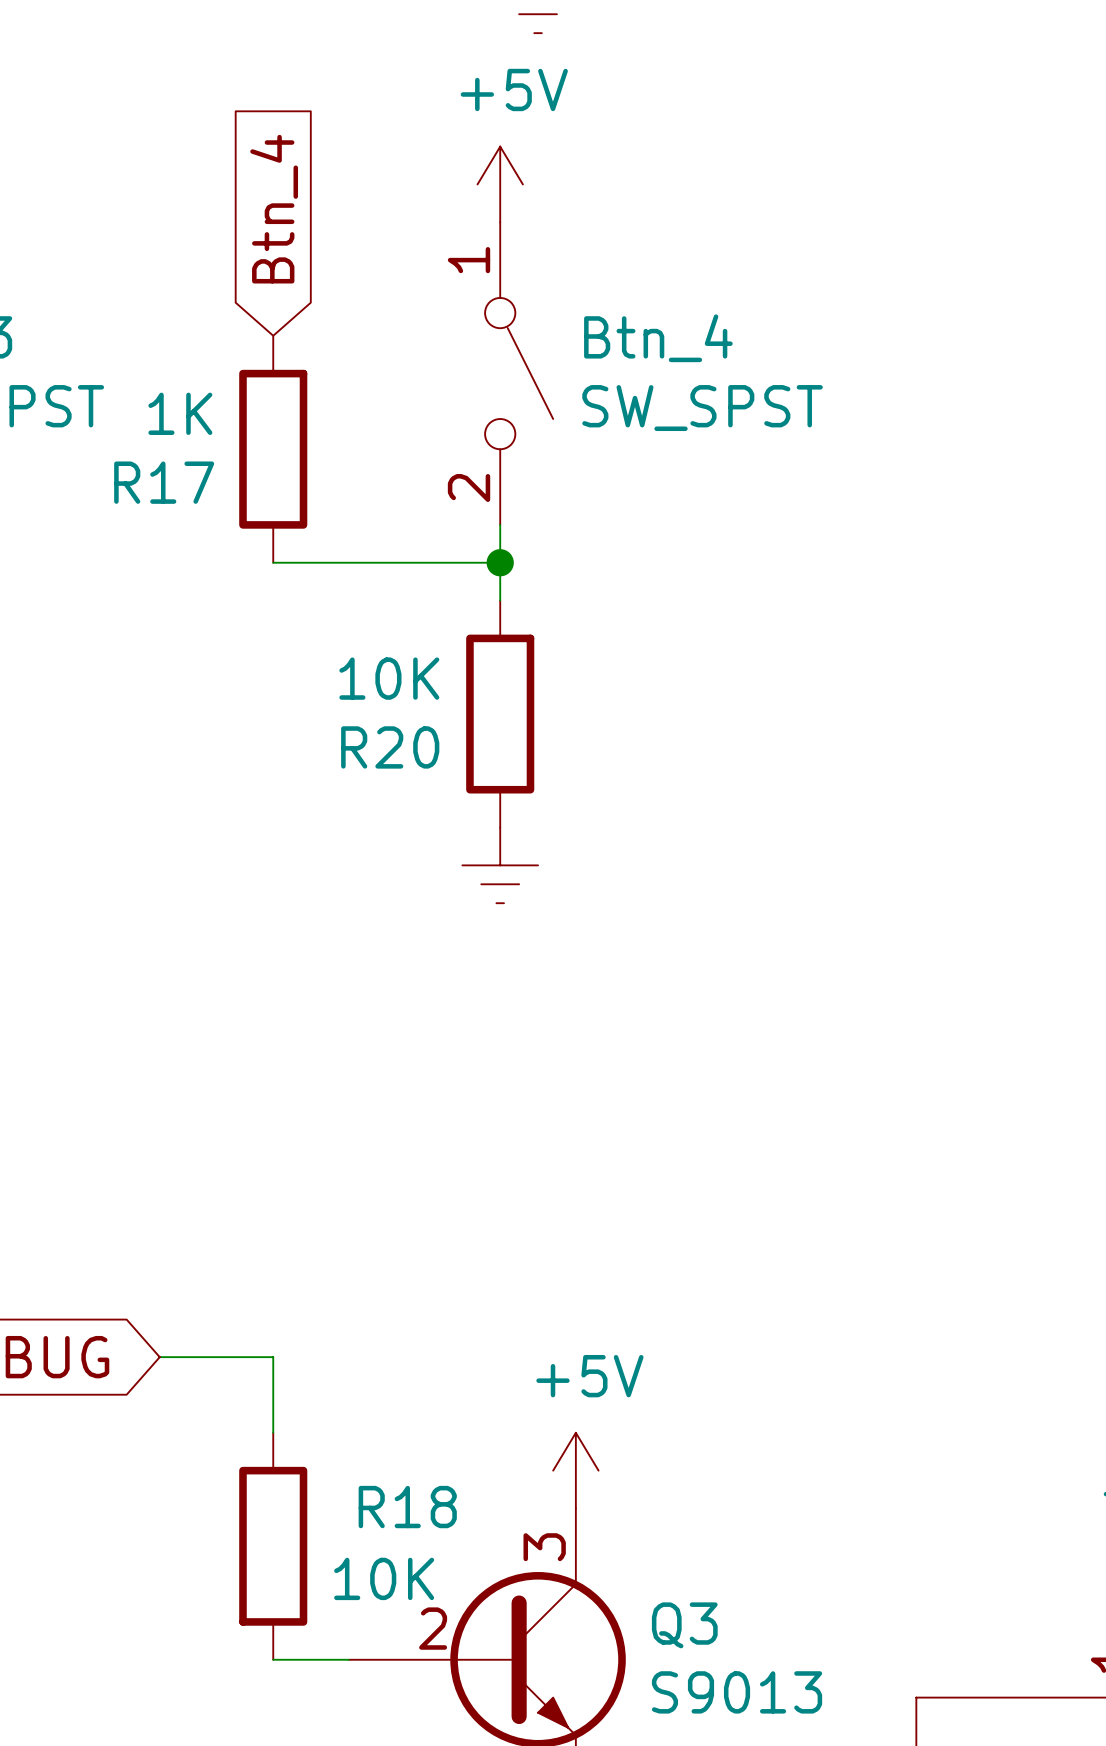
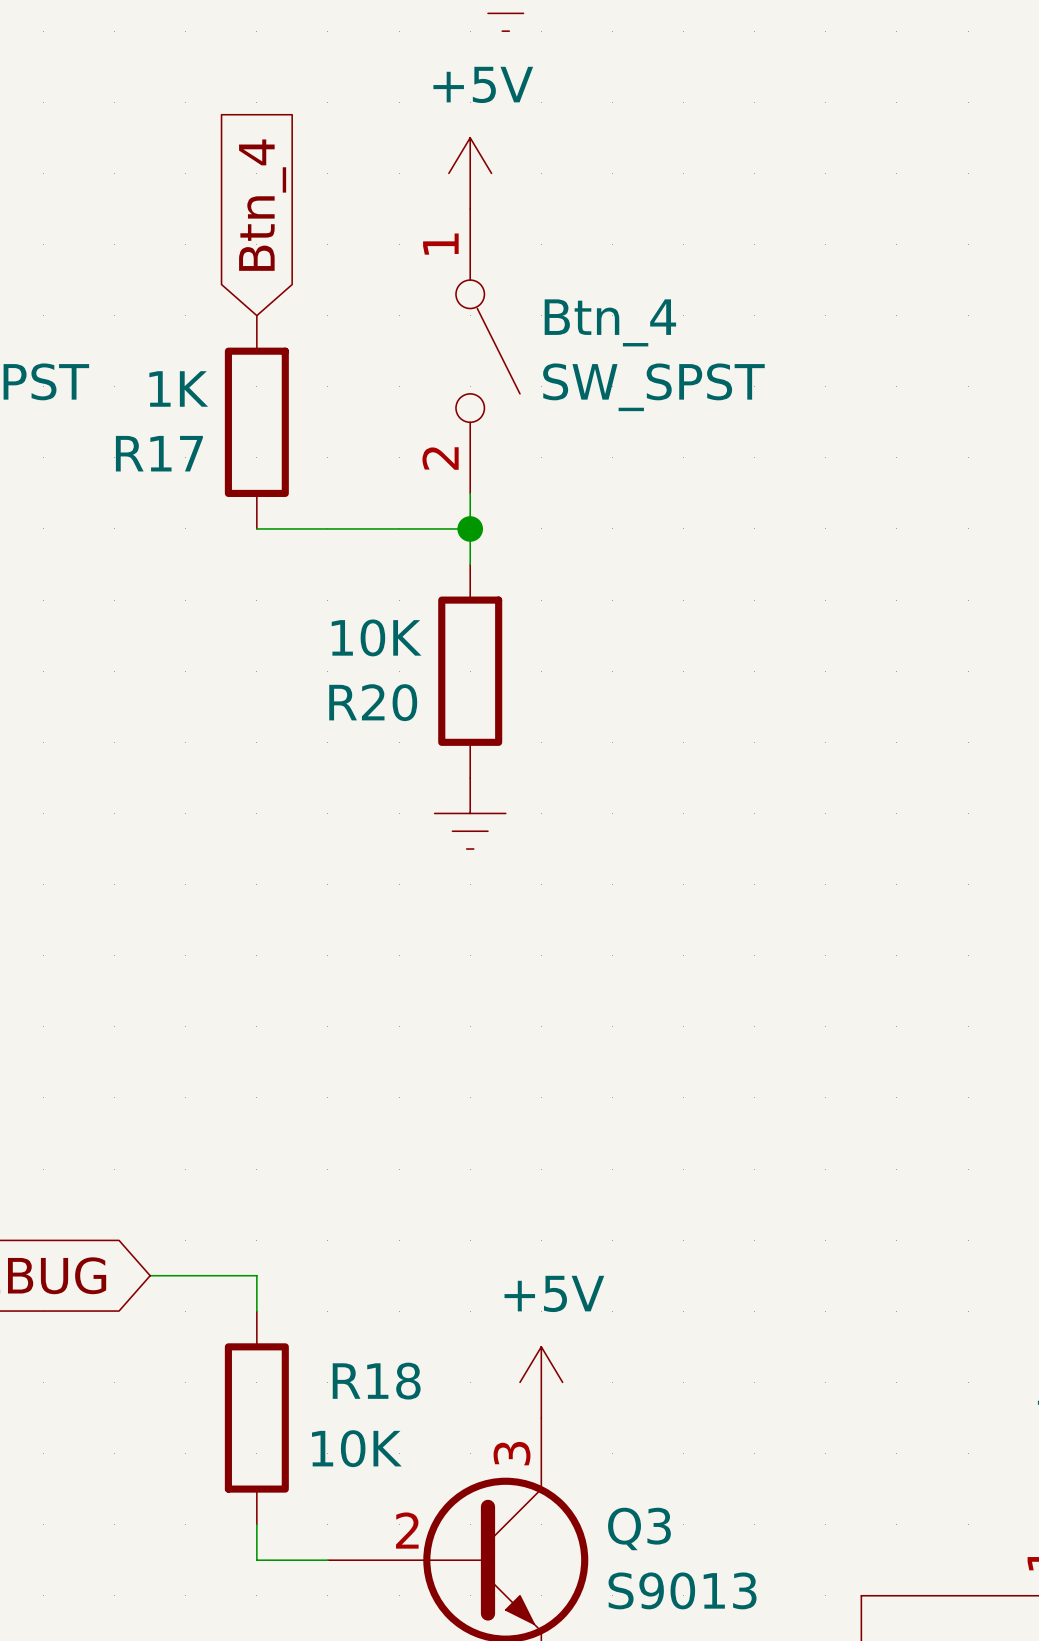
R18 position: (273, 1546) -> (256, 1417)

